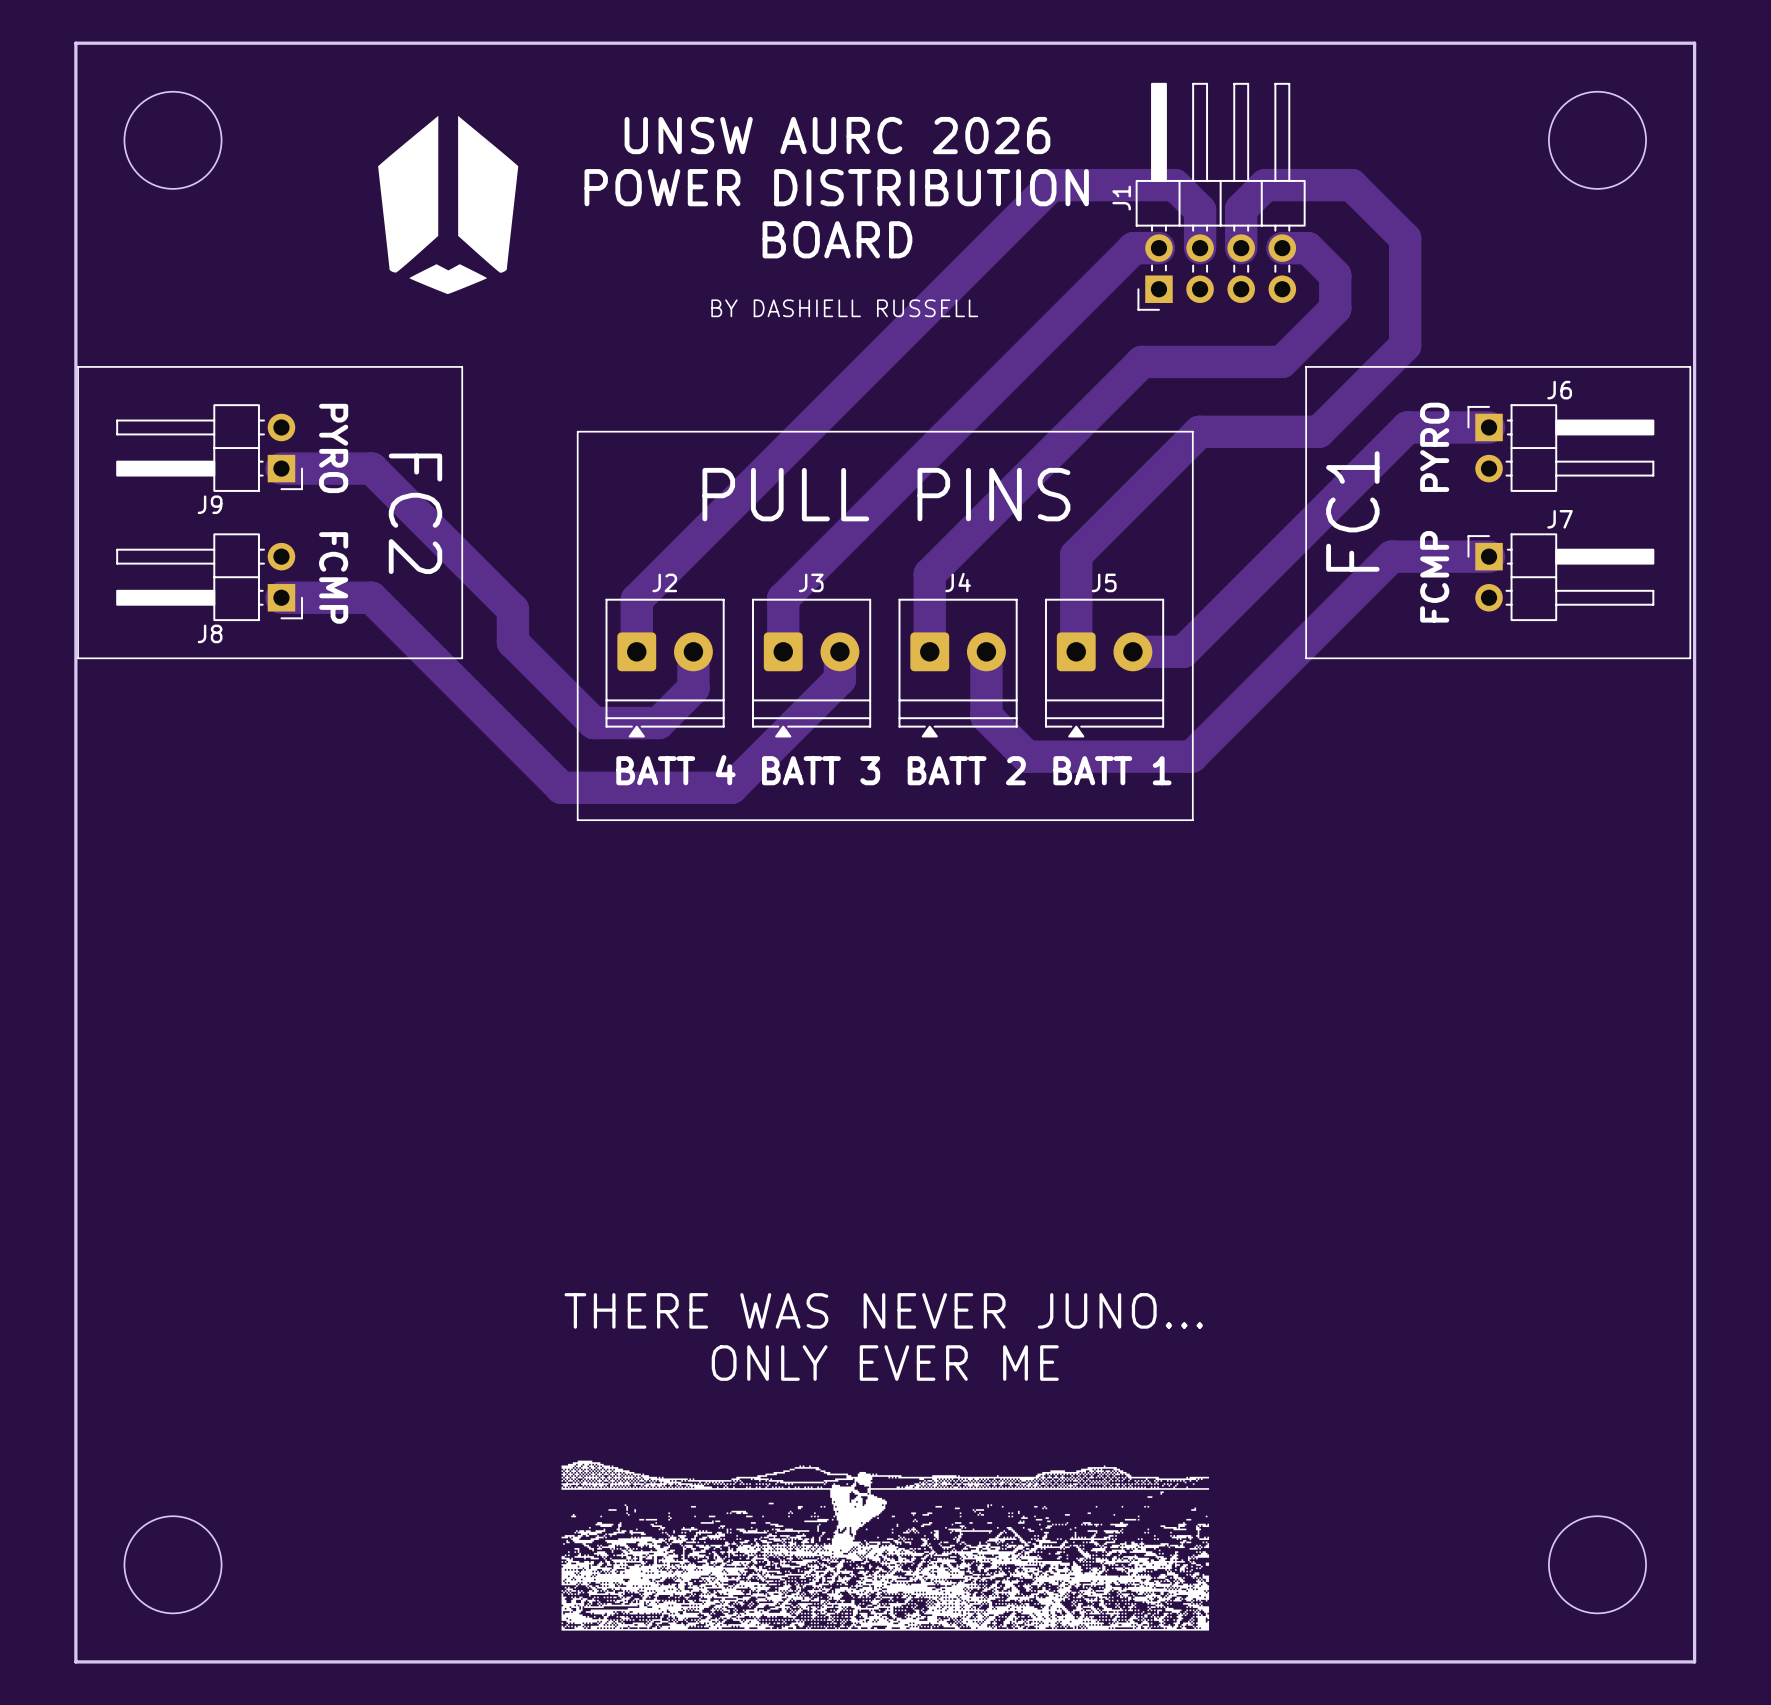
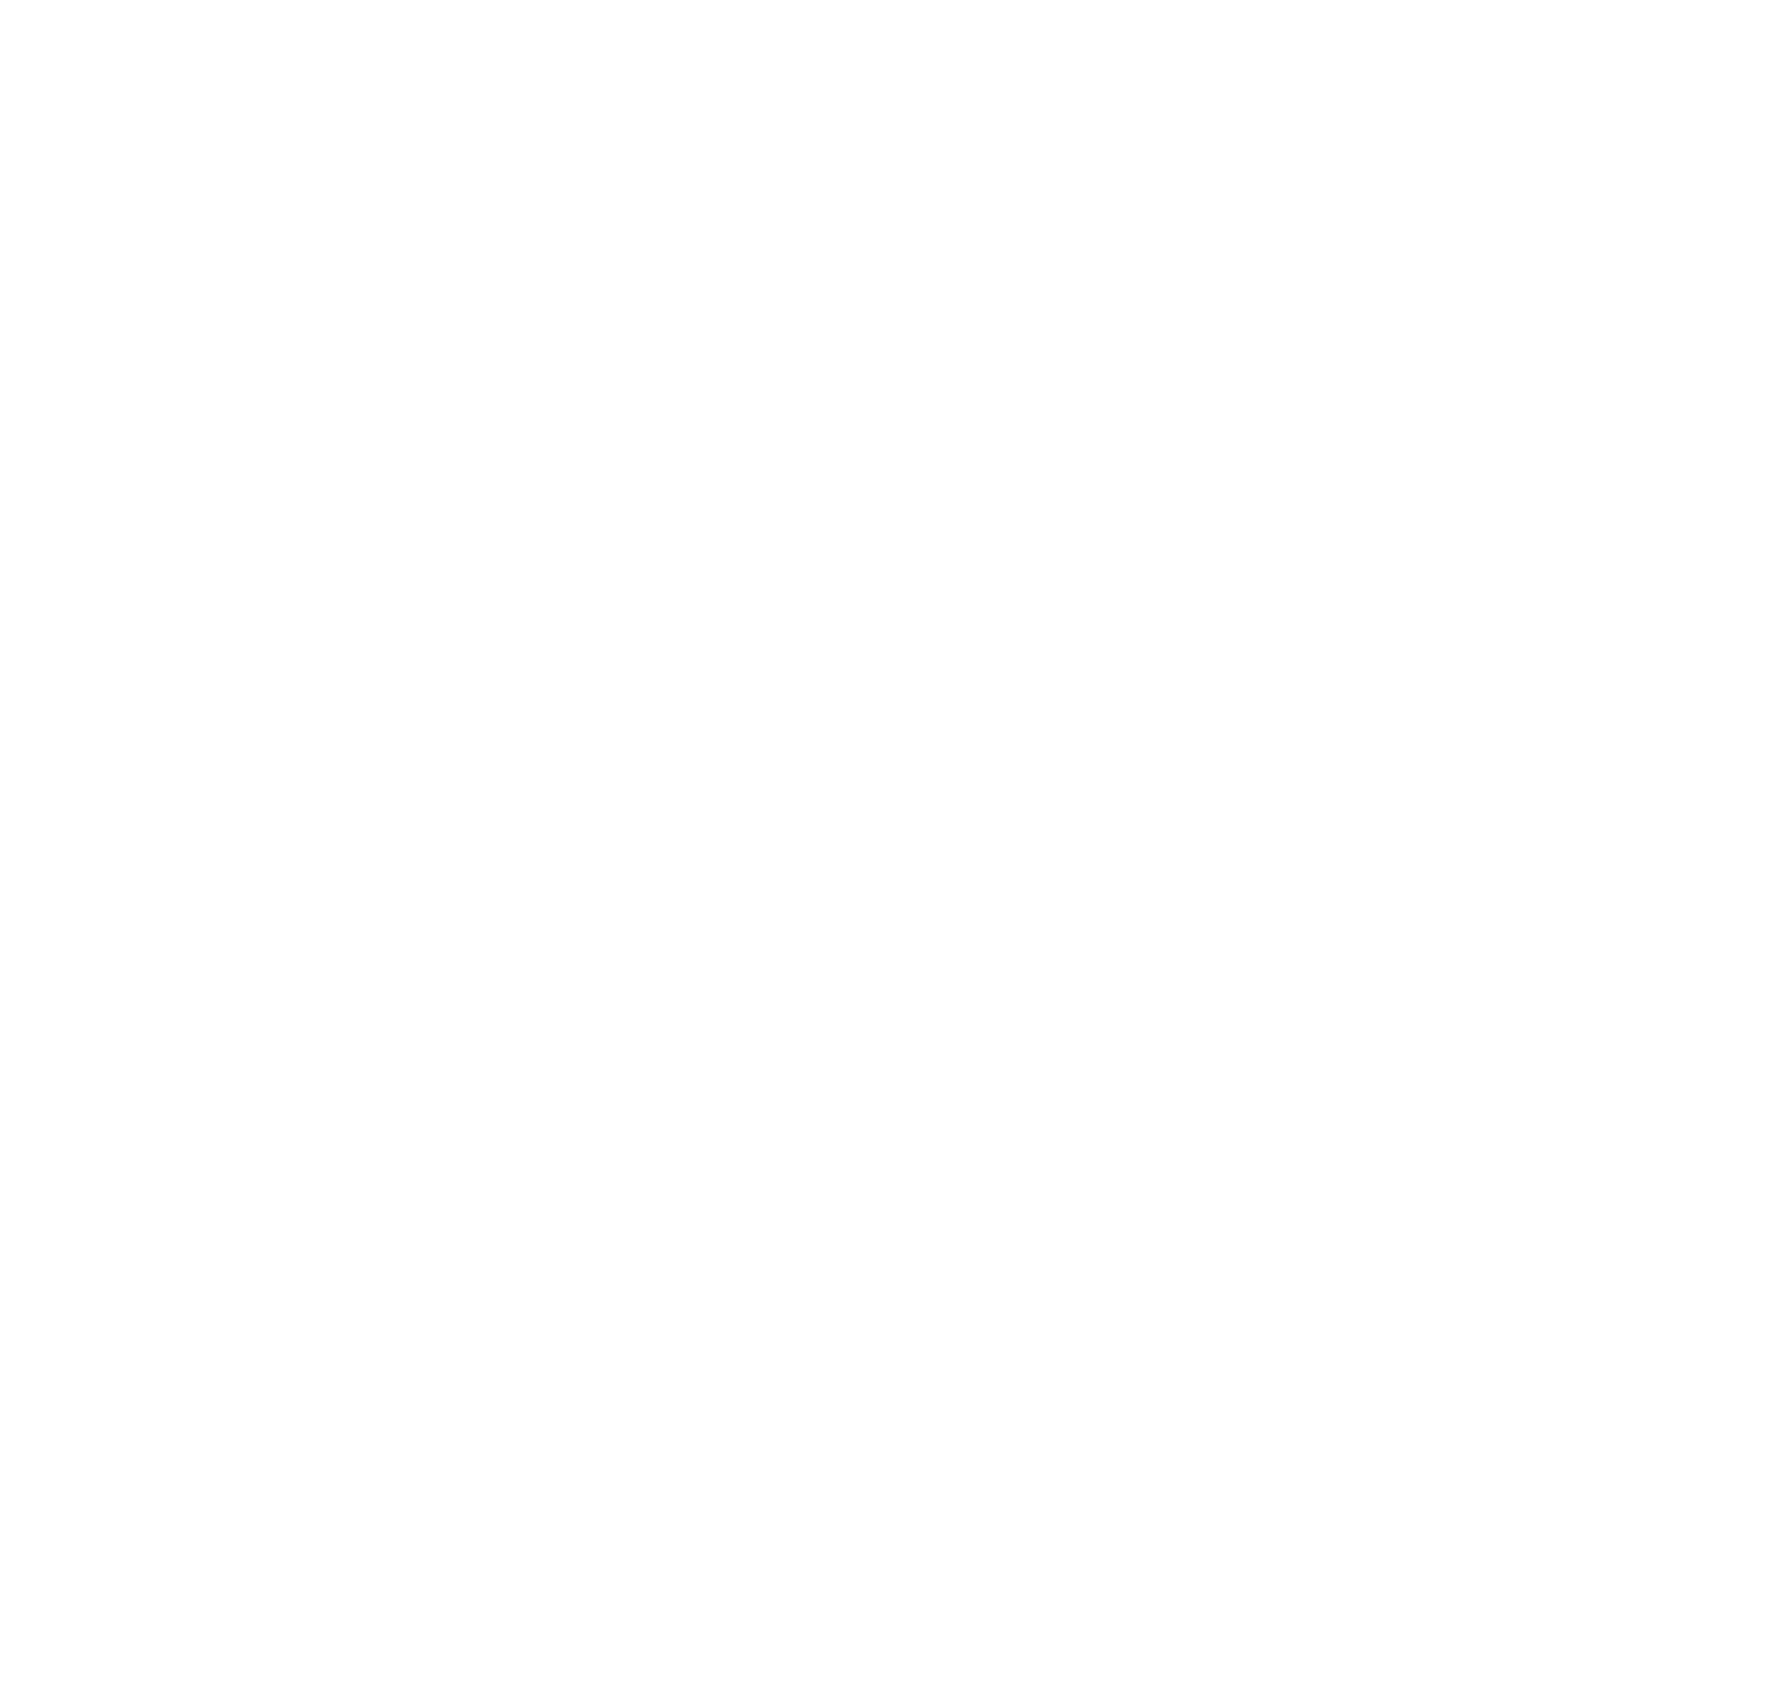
board edge: (75, 43) (1694, 43) (1694, 1661) (75, 1661) (75, 43) -> none
round board edge: [124, 91, 222, 190] -> none
round board edge: [1548, 91, 1647, 190] -> none
drawing: [378, 115, 519, 295] -> none
text: UNSW AURC 2026 (837, 135) -> none
text: POWER DISTRIBUTION (836, 187) -> none
J1: (1220, 196) -> none
text: BOARD (837, 239) -> none
track: (1158, 248) (1133, 248) (783, 598) (783, 651) -> none
track: (1200, 248) (1200, 210) (1174, 185) (1051, 185) (636, 599) (636, 651) -> none
track: (1241, 248) (1241, 209) (1265, 185) (1351, 185) (1405, 238) (1405, 345) (1318, 431) (1199, 431) (1076, 555) (1076, 651) -> none
track: (1282, 248) (1307, 248) (1335, 275) (1335, 308) (1281, 361) (1142, 361) (929, 574) (929, 651) -> none
text: BY DASHIELL RUSSELL (844, 308) -> none
line: (78, 366) (462, 366) (462, 658) (78, 658) (78, 366) -> none
line: (1306, 366) (1690, 366) (1690, 658) (1306, 658) (1306, 366) -> none
track: (1489, 427) (1407, 427) (1183, 651) (1132, 651) -> none
line: (577, 431) (1192, 431) (1192, 820) (577, 820) (577, 431) -> none
text: PYRO (1434, 447) -> none
J9: (209, 448) -> none
text: PYRO (333, 448) -> none
J6: (1560, 448) -> none
track: (281, 468) (371, 468) (512, 609) (512, 642) (593, 723) (658, 723) (693, 688) (693, 651) -> none
text: PULL PINS (886, 494) -> none
text: FC1 (1352, 511) -> none
text: FC2 (415, 513) -> none
track: (1489, 556) (1391, 556) (1191, 756) (1026, 756) (986, 716) (986, 651) -> none
text: FCMP (1434, 576) -> none
J8: (209, 577) -> none
text: FCMP (333, 577) -> none
J7: (1560, 577) -> none
track: (281, 597) (371, 597) (561, 787) (731, 787) (839, 679) (839, 651) -> none
J2: (665, 668) -> none
J3: (811, 668) -> none
J4: (958, 668) -> none
J5: (1104, 668) -> none
text: BATT 4 (675, 770) -> none
text: BATT 3 (821, 770) -> none
text: BATT 2 (966, 770) -> none
text: BATT 1 (1112, 770) -> none
text: THERE WAS NEVER JUNO... (883, 1310) -> none
text: ONLY EVER ME (885, 1363) -> none
drawing: [561, 1460, 1210, 1631] -> none
round board edge: [124, 1515, 222, 1614] -> none
round board edge: [1548, 1515, 1647, 1614] -> none

